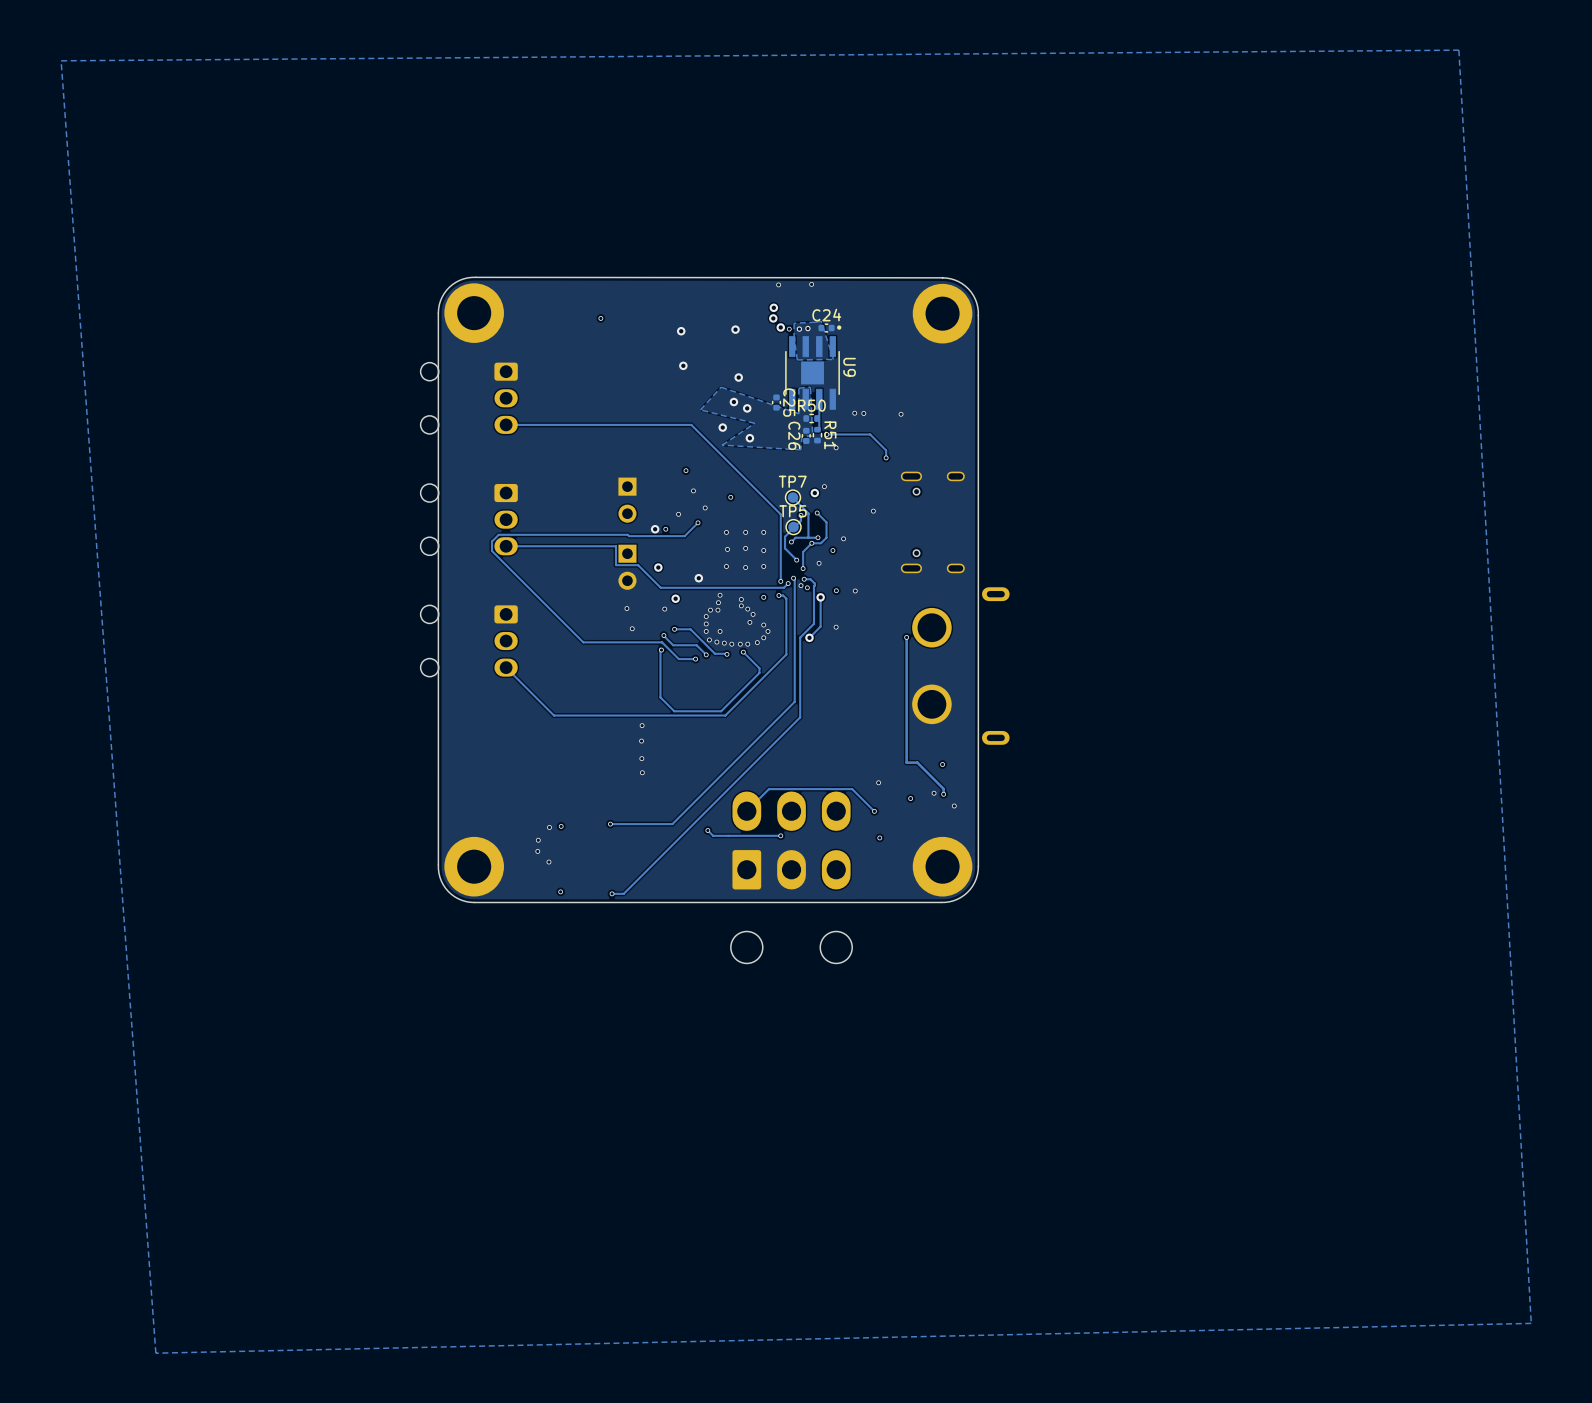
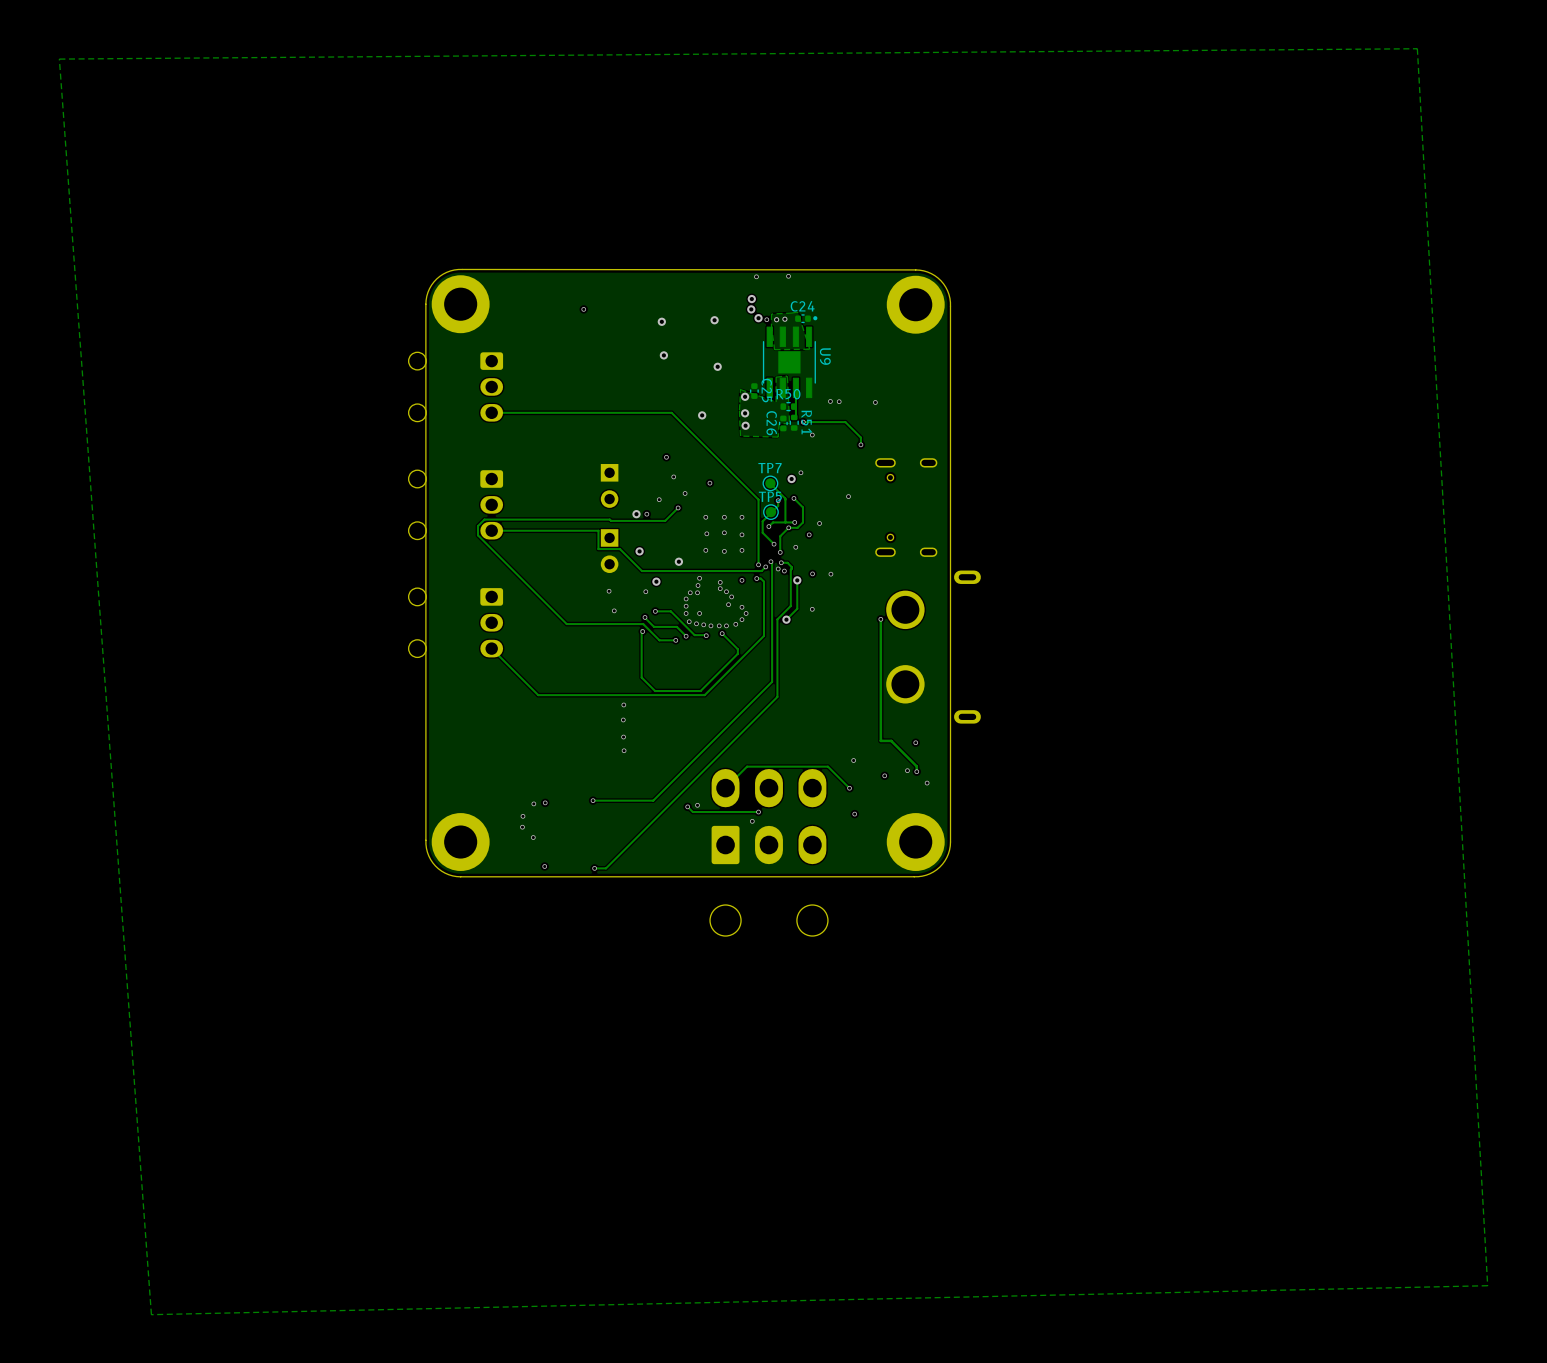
via: (733, 402) -> none
via: (747, 408) -> none
via: none -> (745, 396)
zone outline: (798, 413) (721, 387) (700, 410) (754, 423) (722, 445) (800, 449) -> (776, 401) (740, 389) (740, 436) (778, 437)
via: none -> (745, 413)
via: (749, 438) -> none
via: none -> (745, 425)
via: none -> (697, 805)
via: none -> (752, 821)

